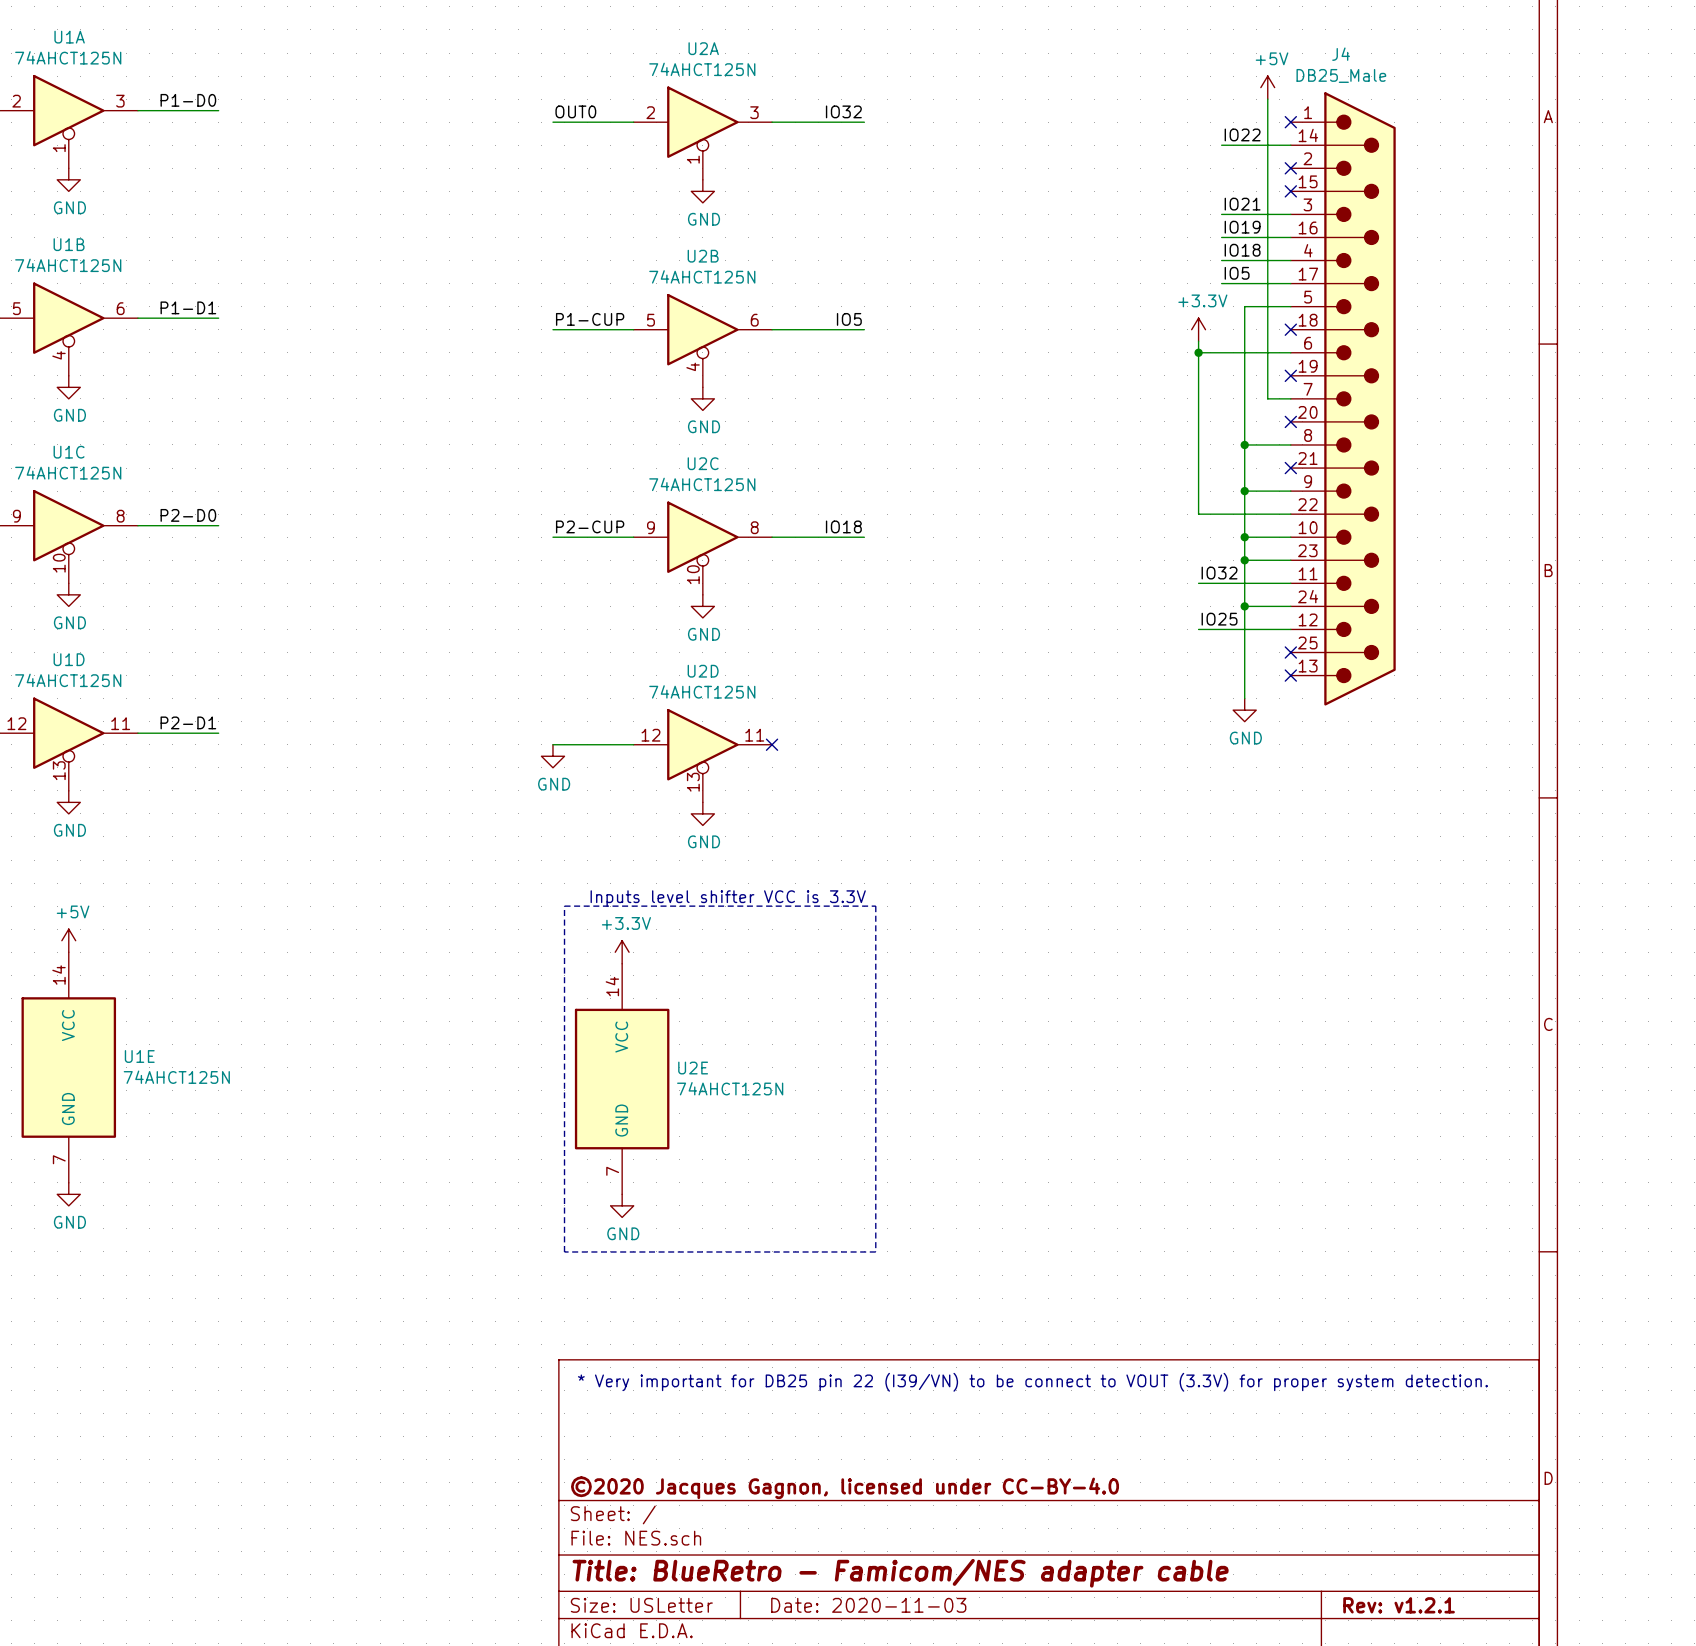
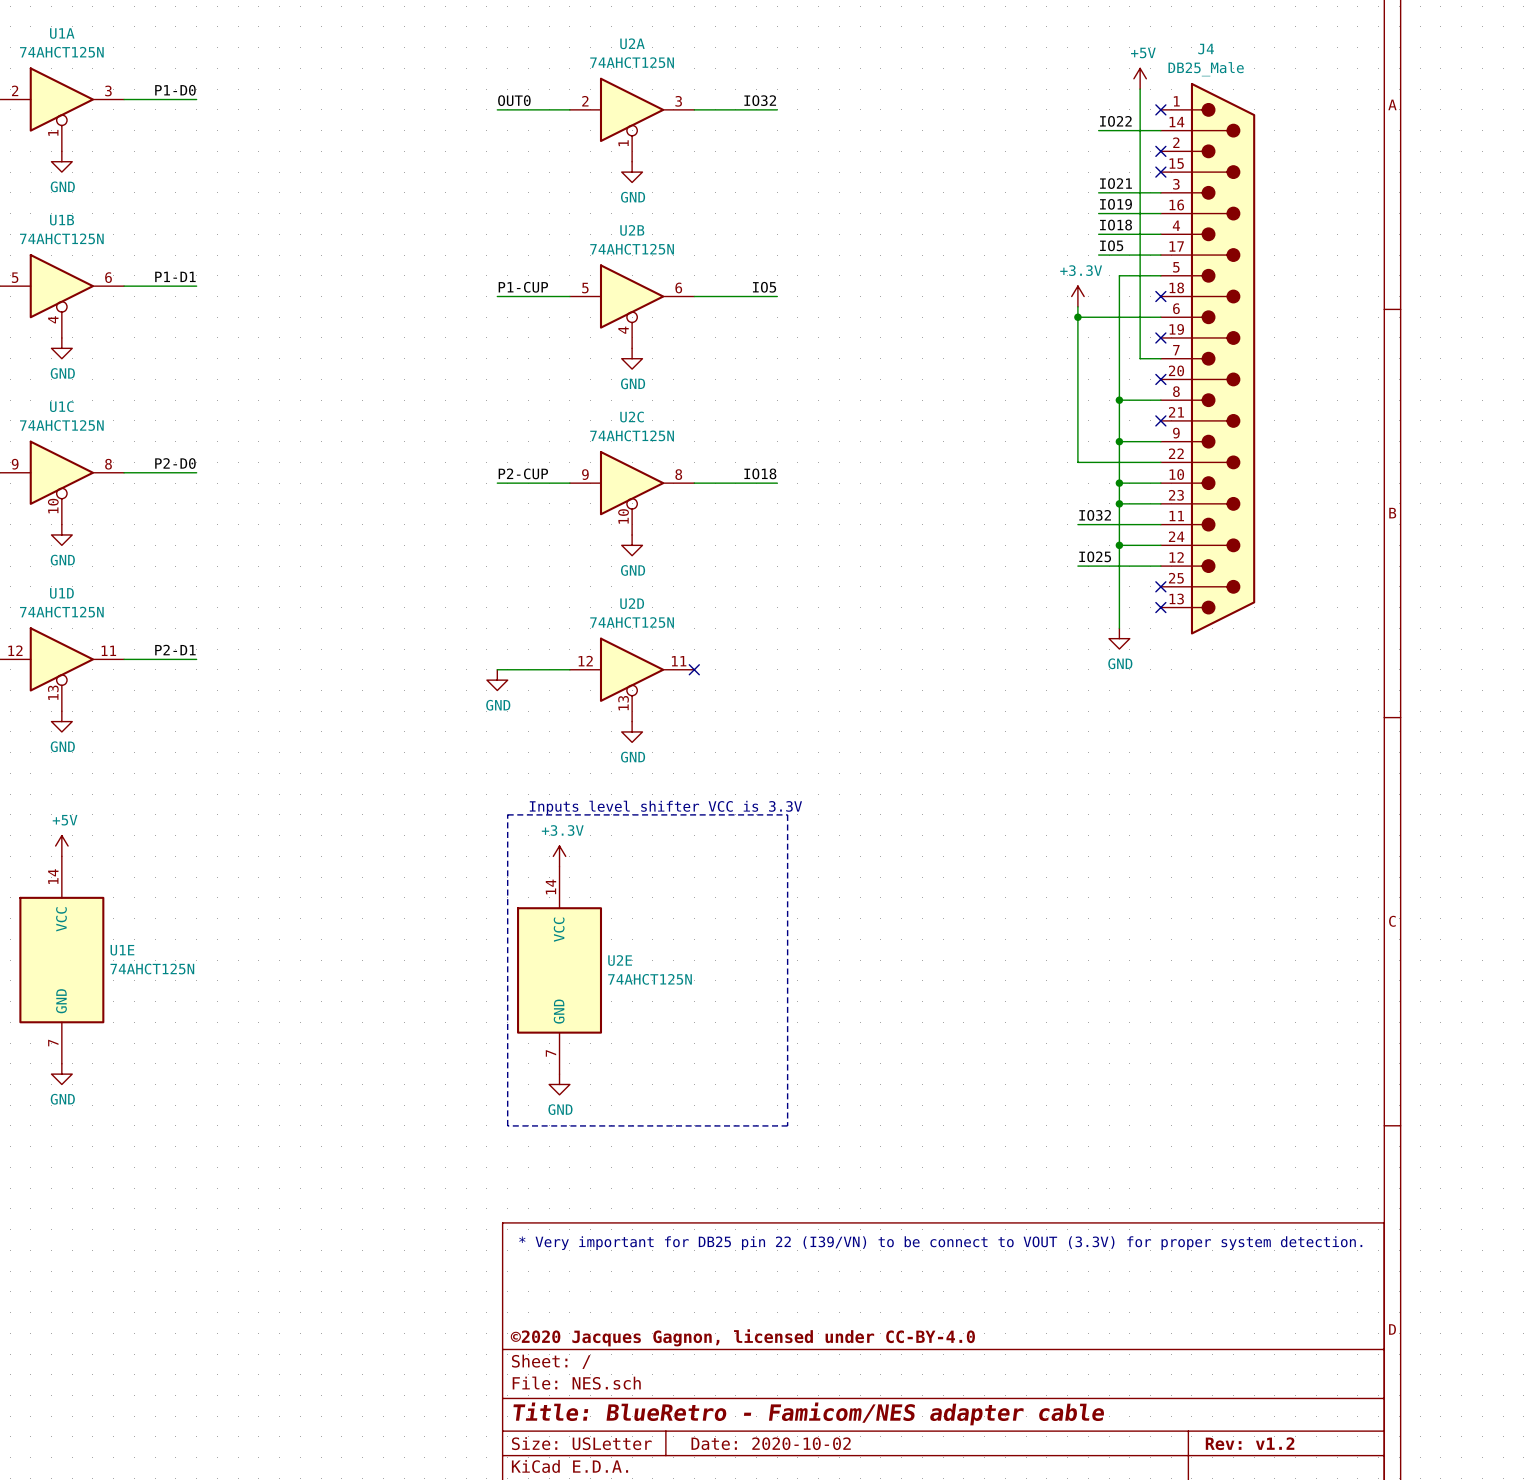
title block: Date: 2020-11-03 (868, 1605) -> Date: 2020-10-02 (771, 1443)
title block: Rev: v1.2.1 (1399, 1605) -> Rev: v1.2 (1250, 1443)

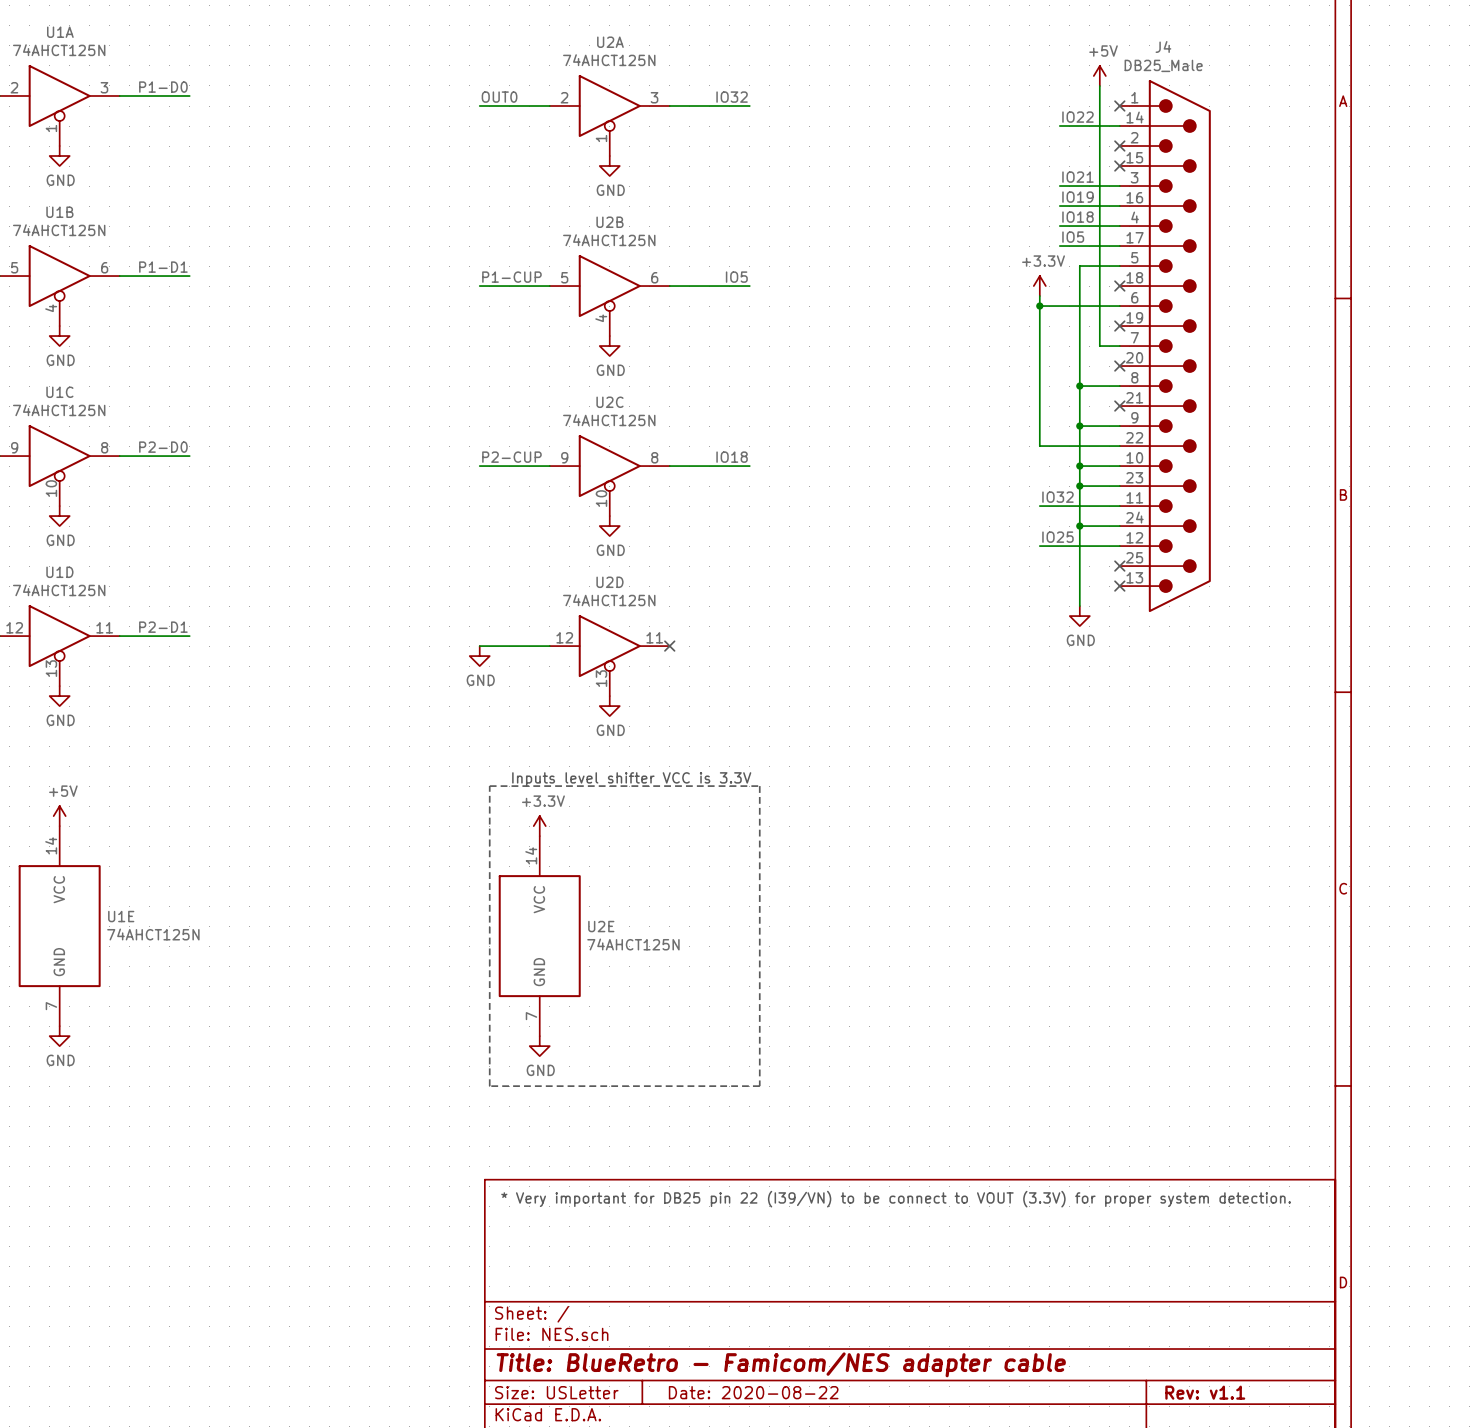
title block: ©2020 Jacques Gagnon, licensed under CC-BY-4.0 (742, 1337) -> none
title block: Date: 2020-10-02 (771, 1443) -> Date: 2020-08-22 (753, 1392)
title block: Rev: v1.2 (1250, 1443) -> Rev: v1.1 (1205, 1392)

